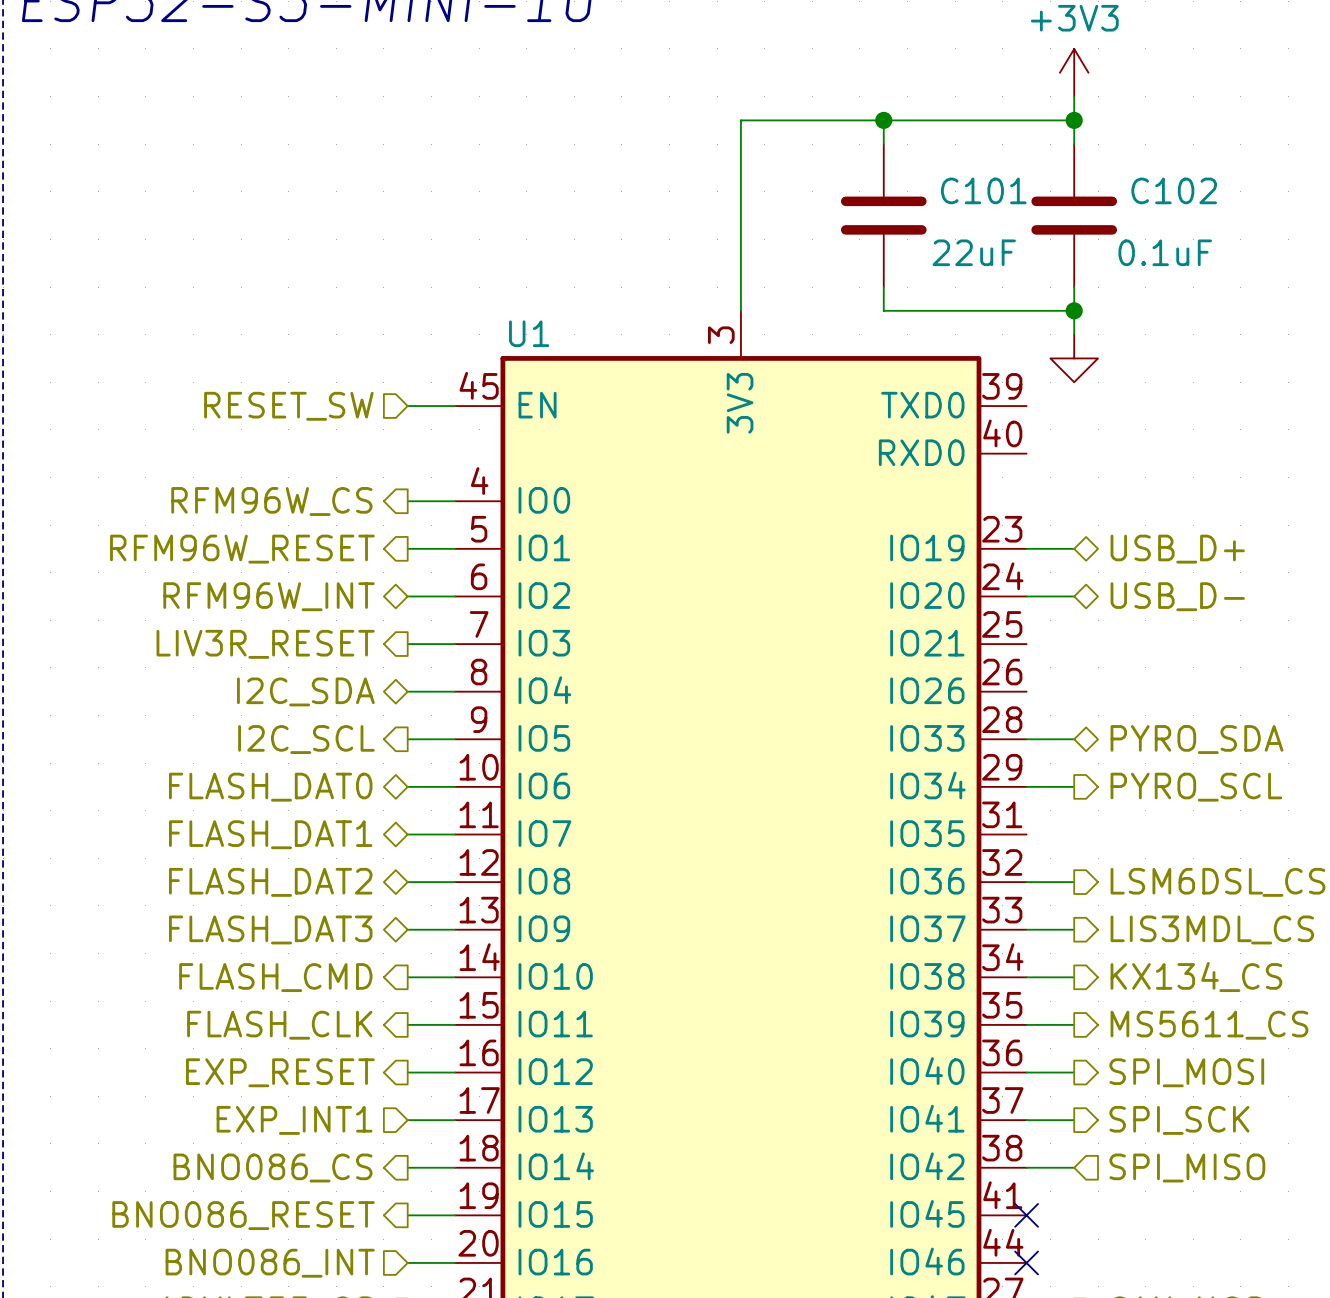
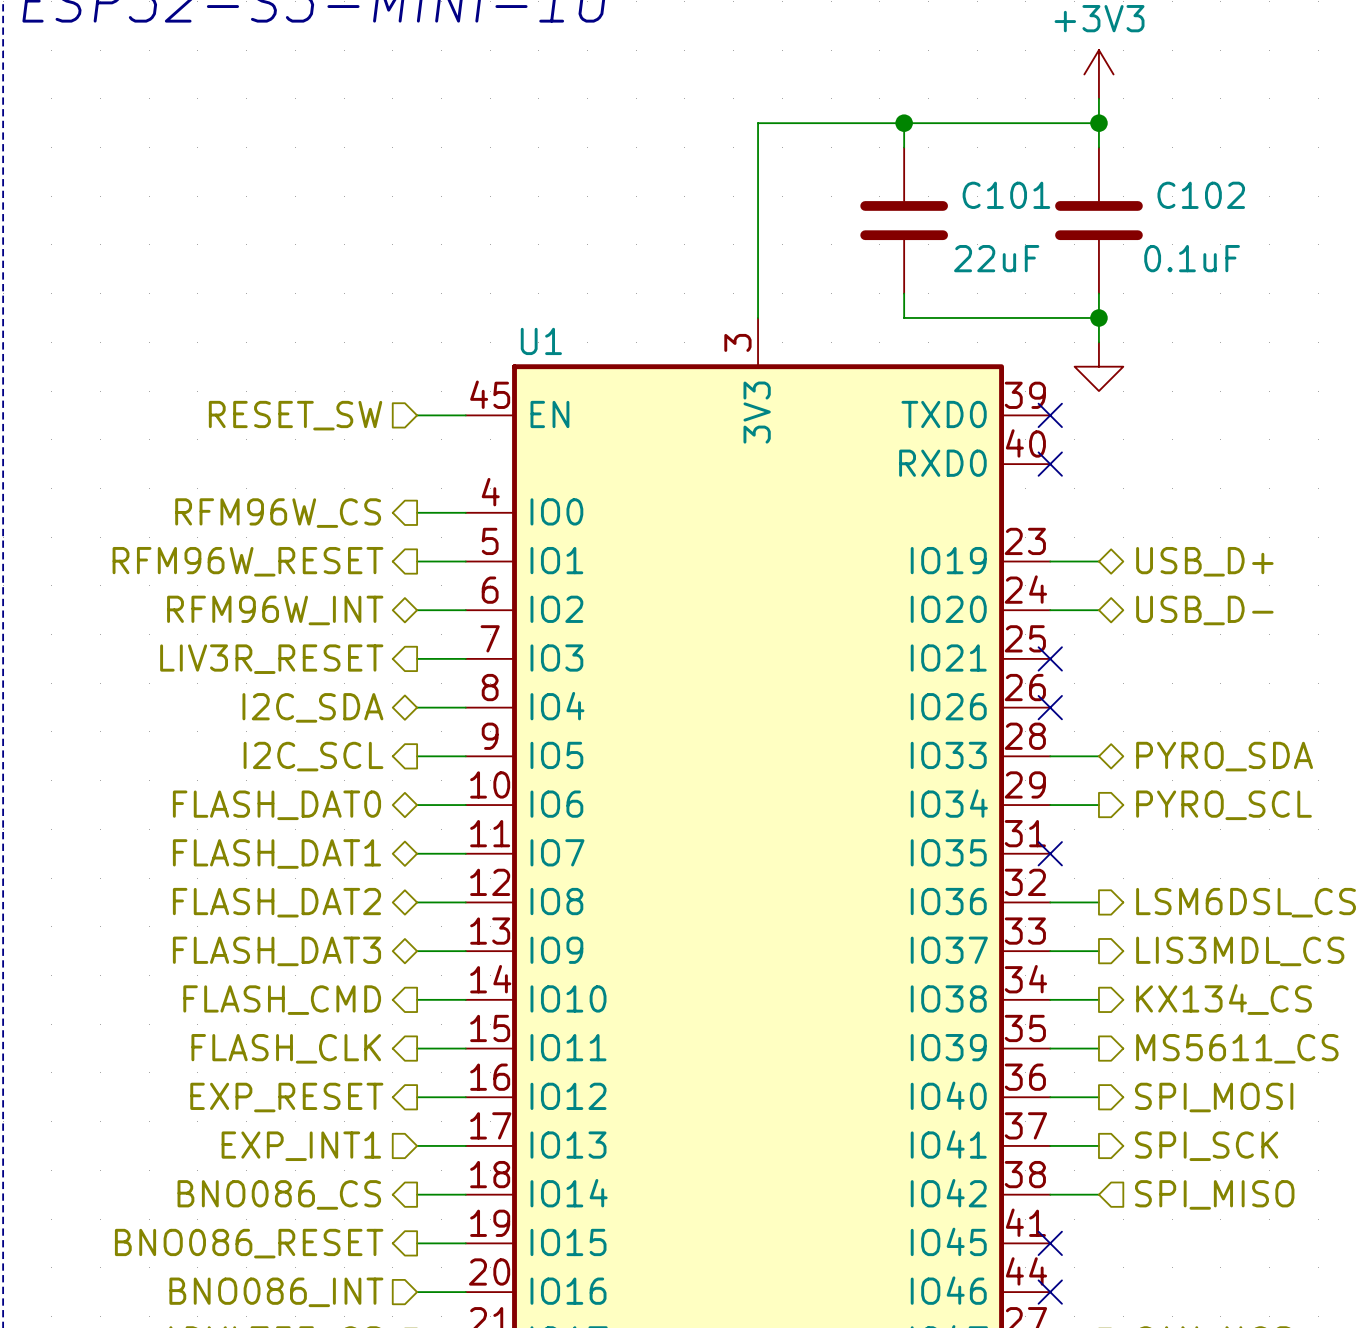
no-connect mark: none -> (1050, 415)
no-connect mark: none -> (1050, 464)
no-connect mark: none -> (1050, 658)
no-connect mark: none -> (1050, 707)
no-connect mark: none -> (1050, 853)

